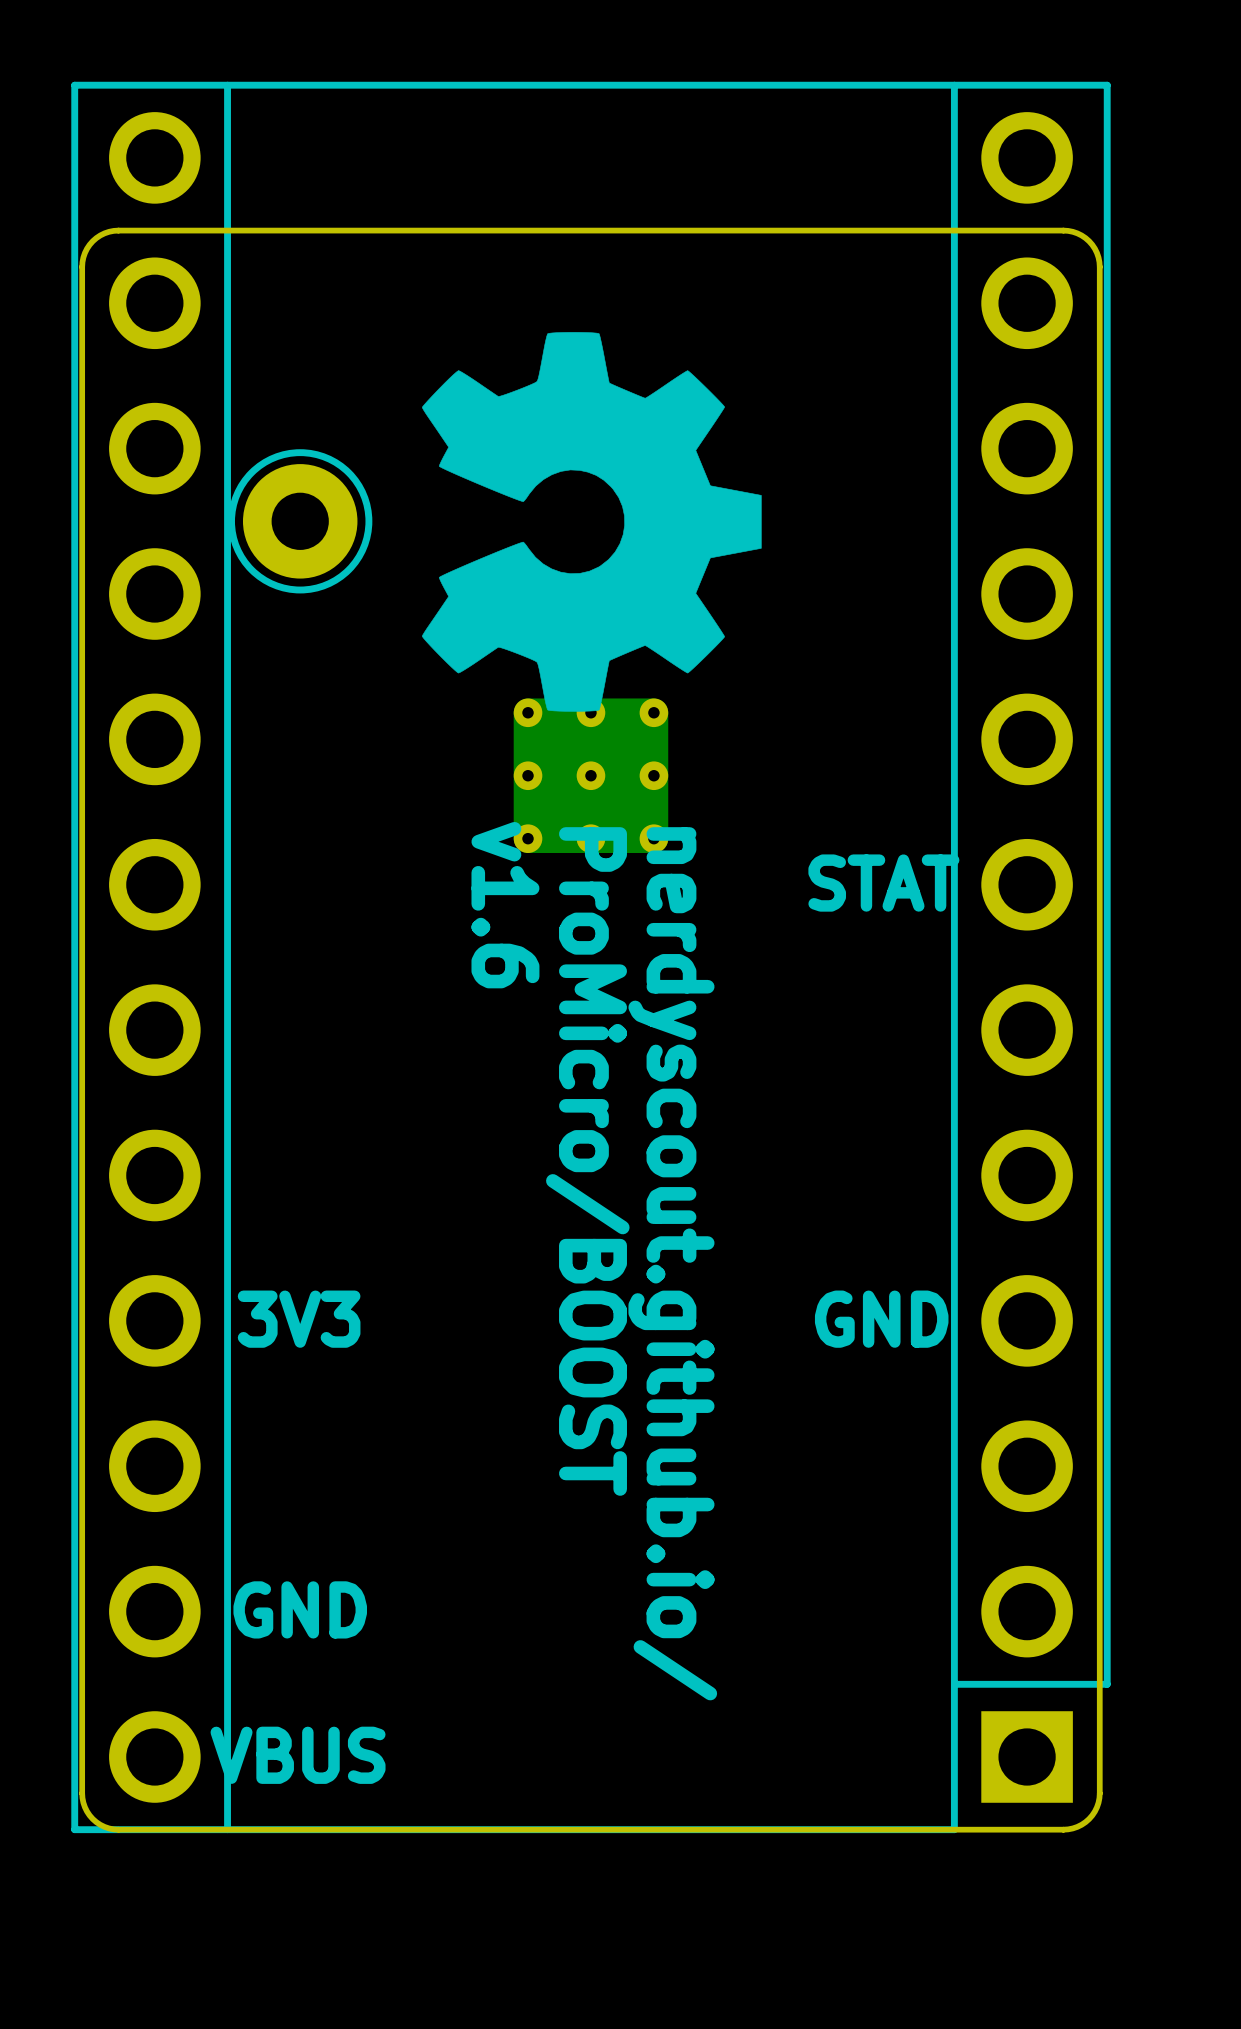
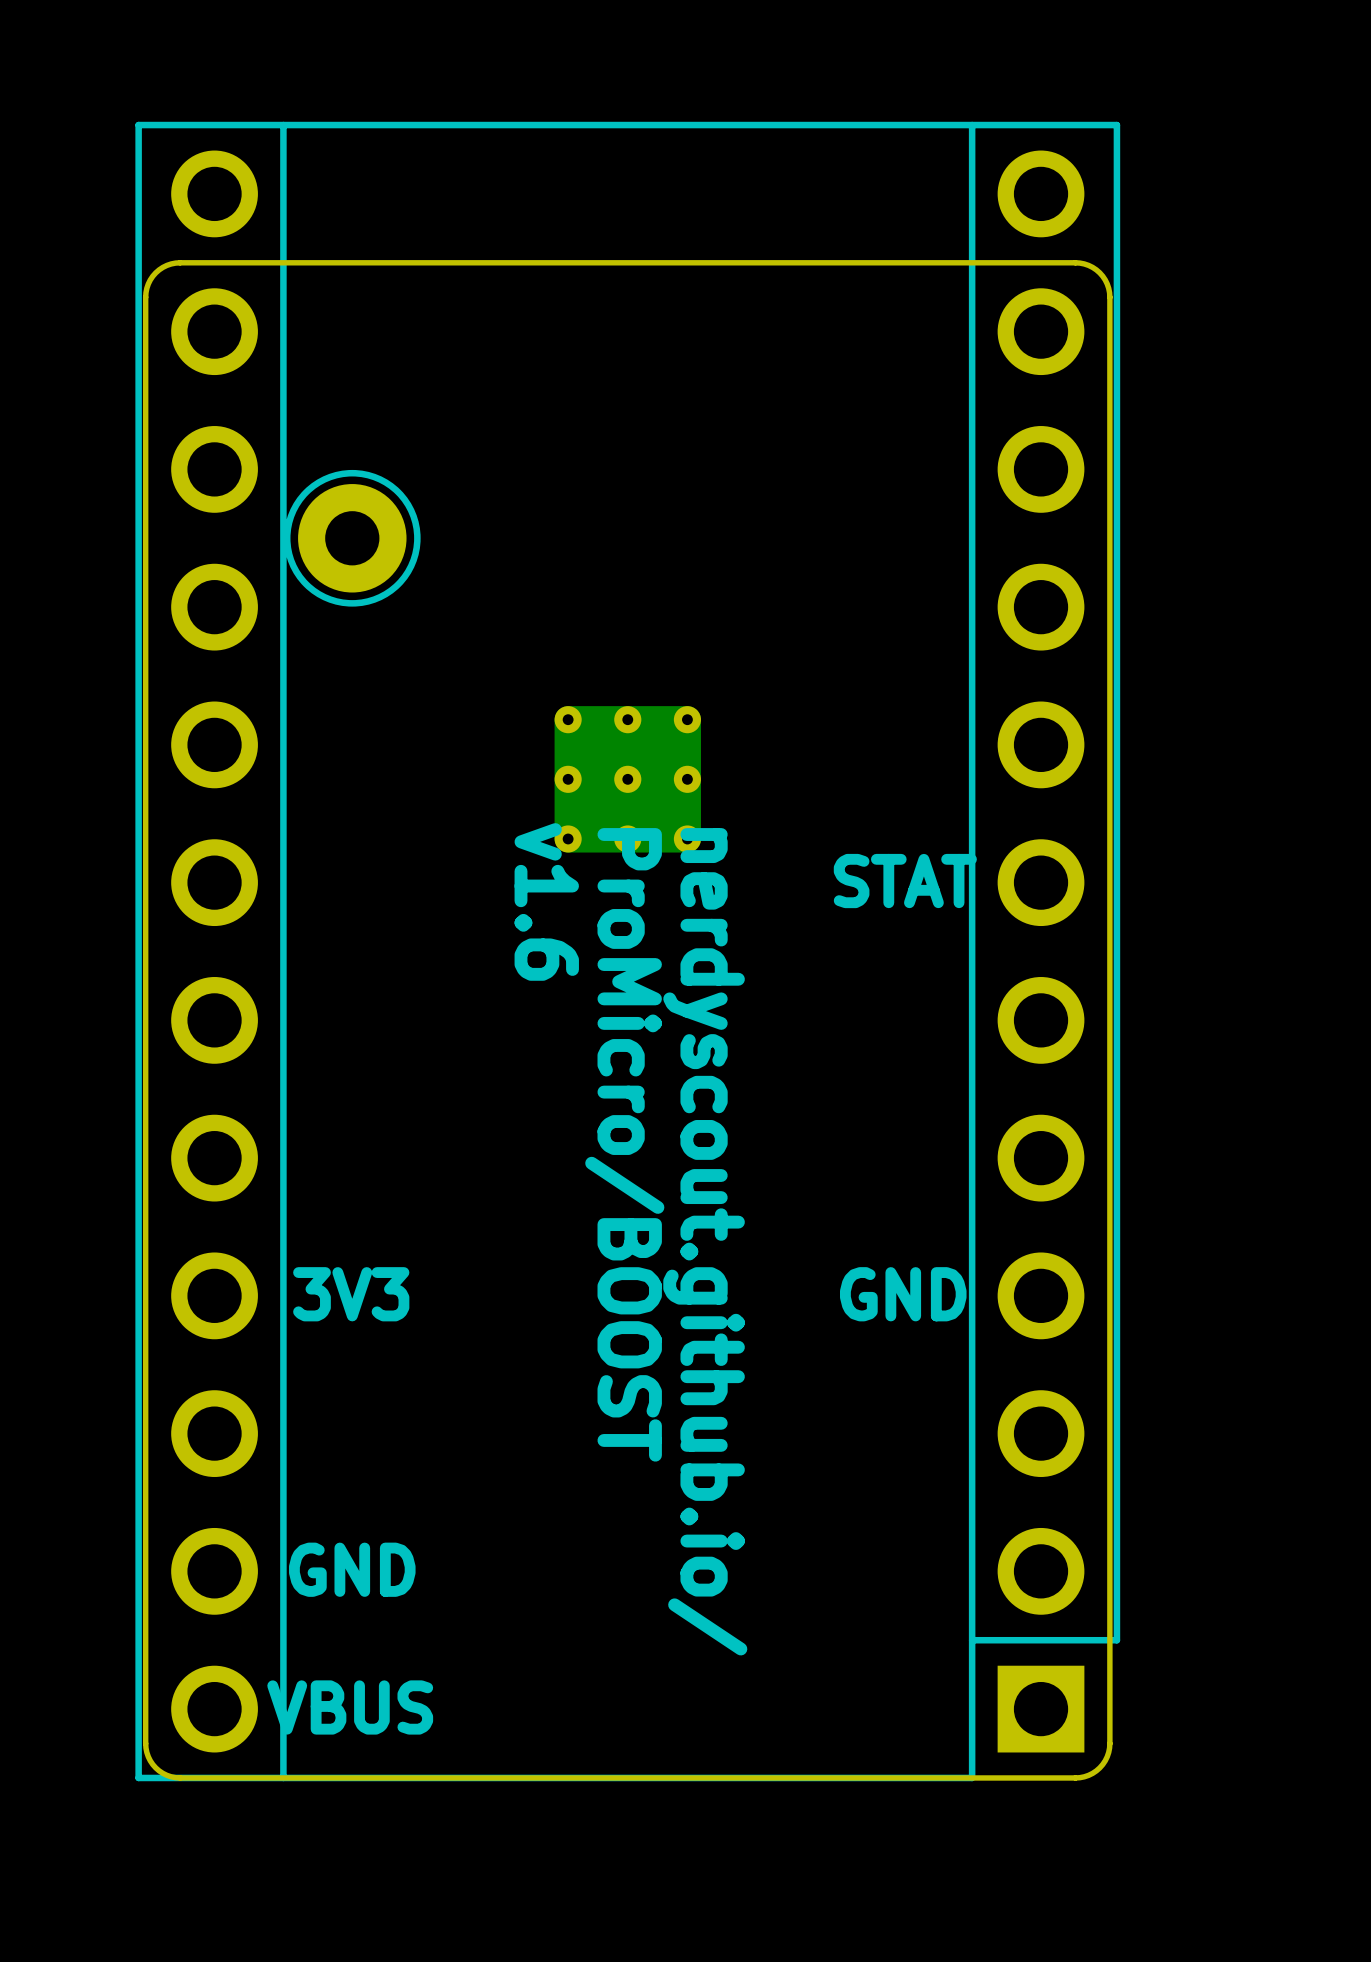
drawing: [421, 332, 762, 712] -> none

